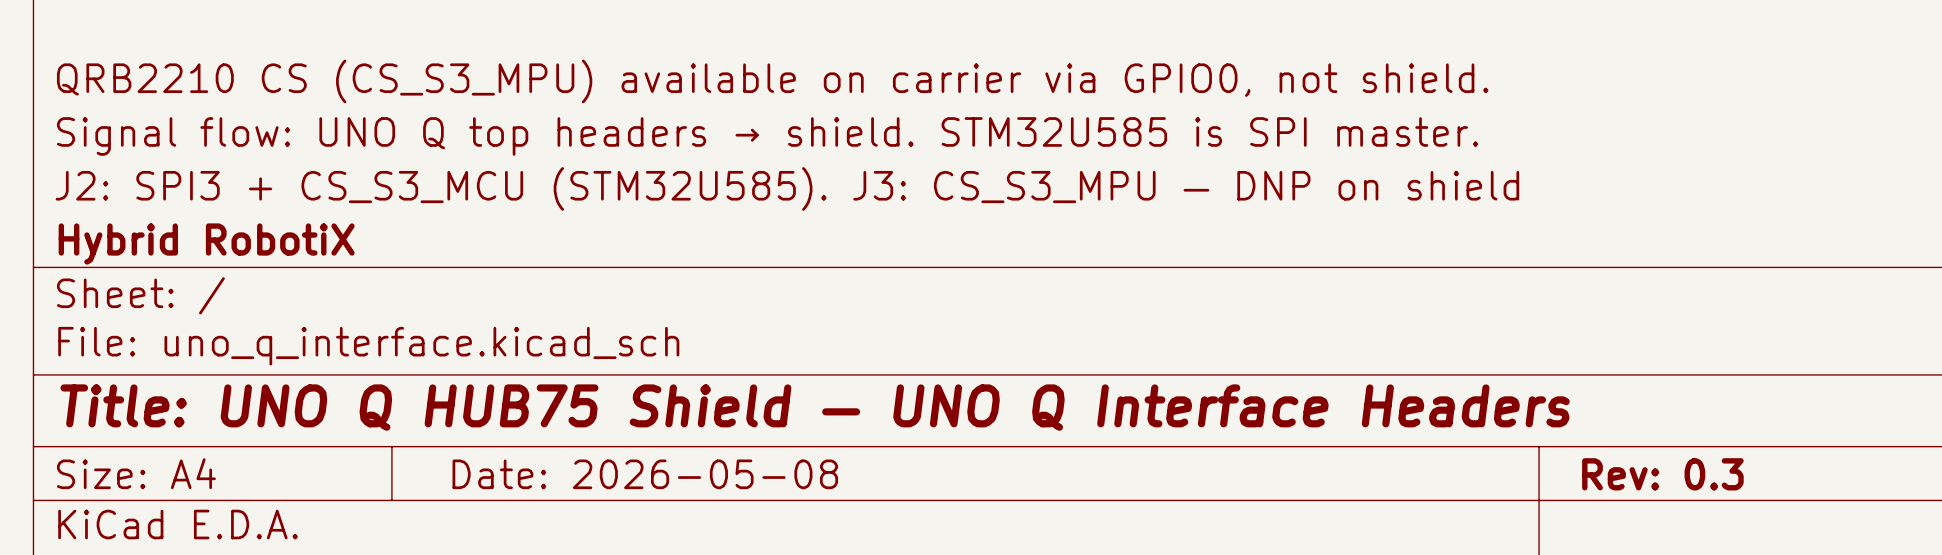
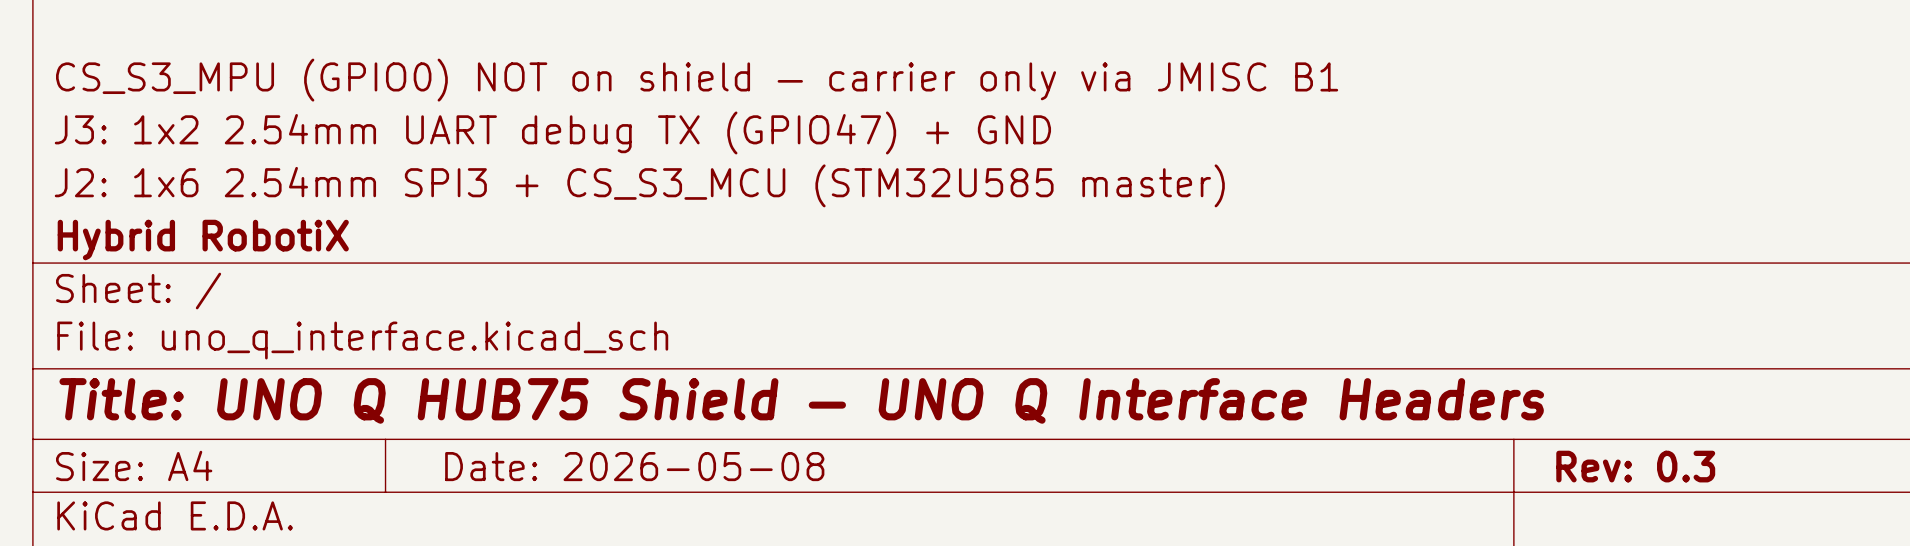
title block: QRB2210 CS (CS_S3_MPU) available on carrier via GPIO0, not shield. (772, 81) -> CS_S3_MPU (GPIO0) NOT on shield — carrier only via JMISC B1 (697, 80)
title block: Signal flow: UNO Q top headers → shield. STM32U585 is SPI master. (767, 136) -> J3: 1x2 2.54mm UART debug TX (GPIO47) + GND (552, 132)
title block: J2: SPI3 + CS_S3_MCU (STM32U585). J3: CS_S3_MPU — DNP on shield (787, 188) -> J2: 1x6 2.54mm SPI3 + CS_S3_MCU (STM32U585 master) (639, 185)

